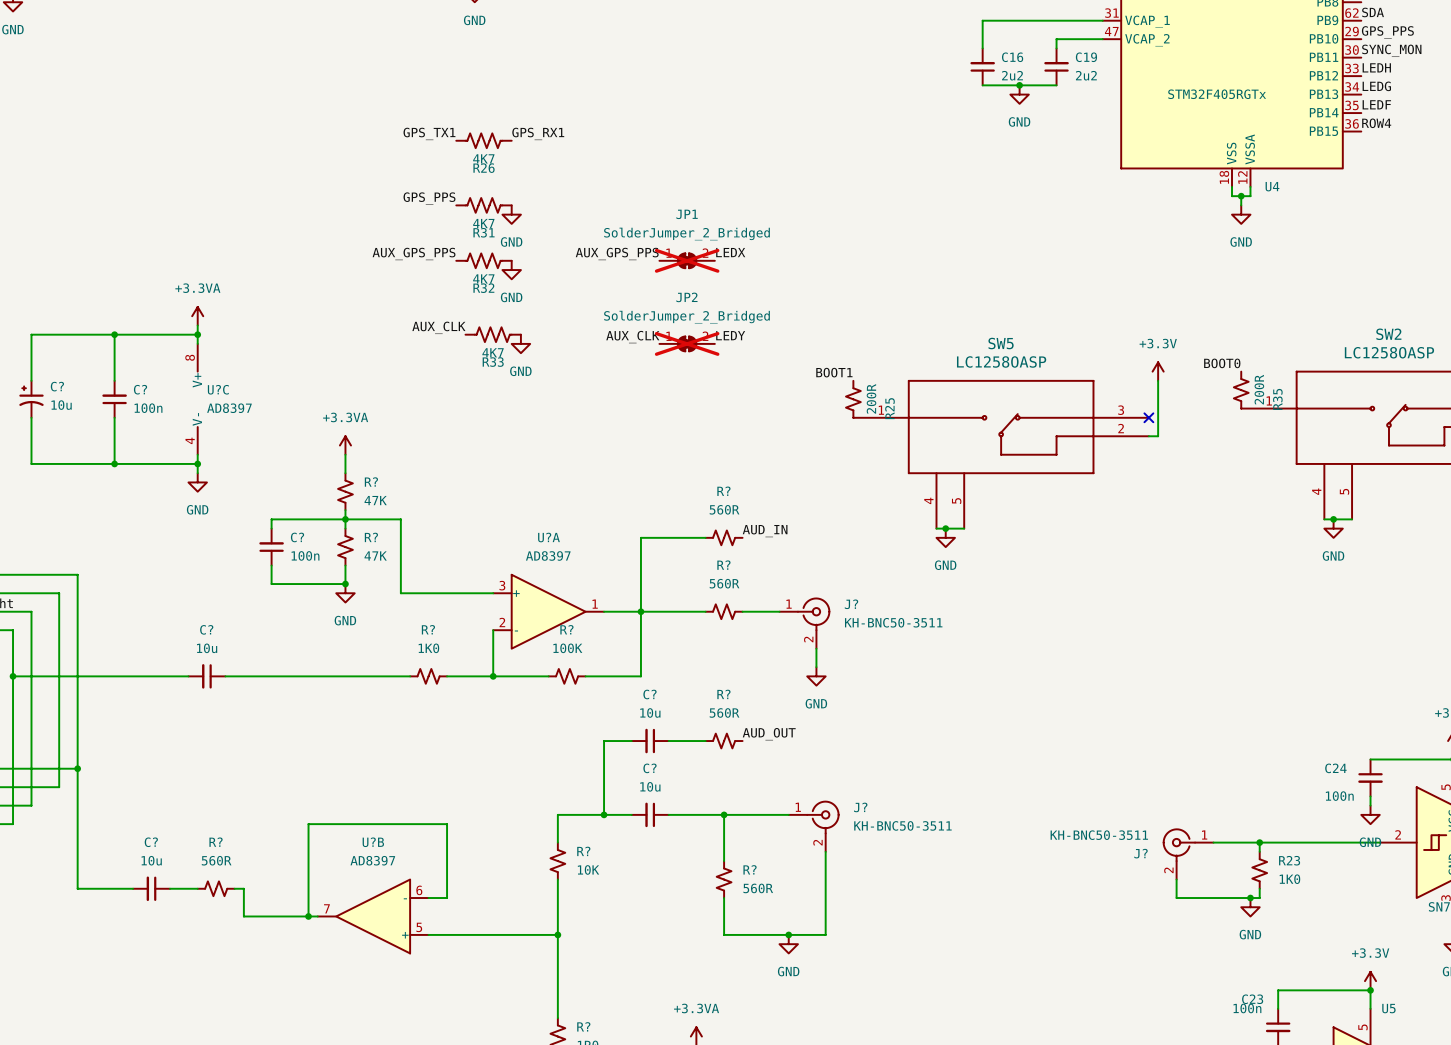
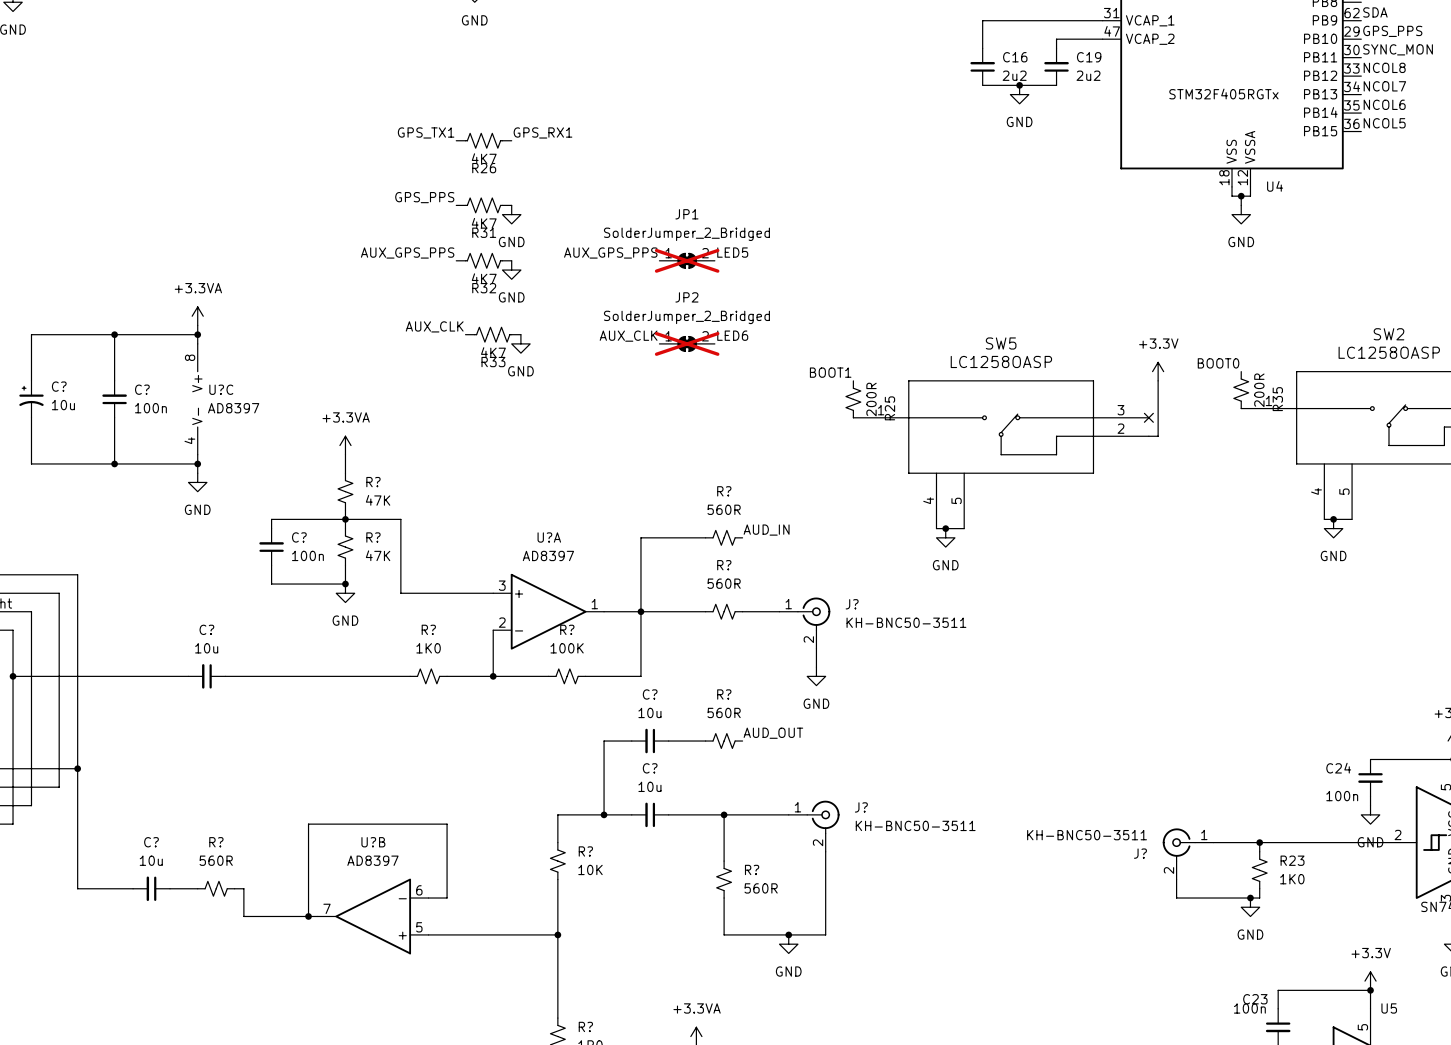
label: LEDH (1376, 67) -> NCOL8 (1384, 67)
label: LEDG (1376, 86) -> NCOL7 (1384, 86)
label: LEDF (1376, 104) -> NCOL6 (1384, 104)
label: ROW4 (1376, 123) -> NCOL5 (1384, 123)
label: LEDX (730, 252) -> LED5 (732, 252)
label: LEDY (730, 335) -> LED6 (732, 335)

